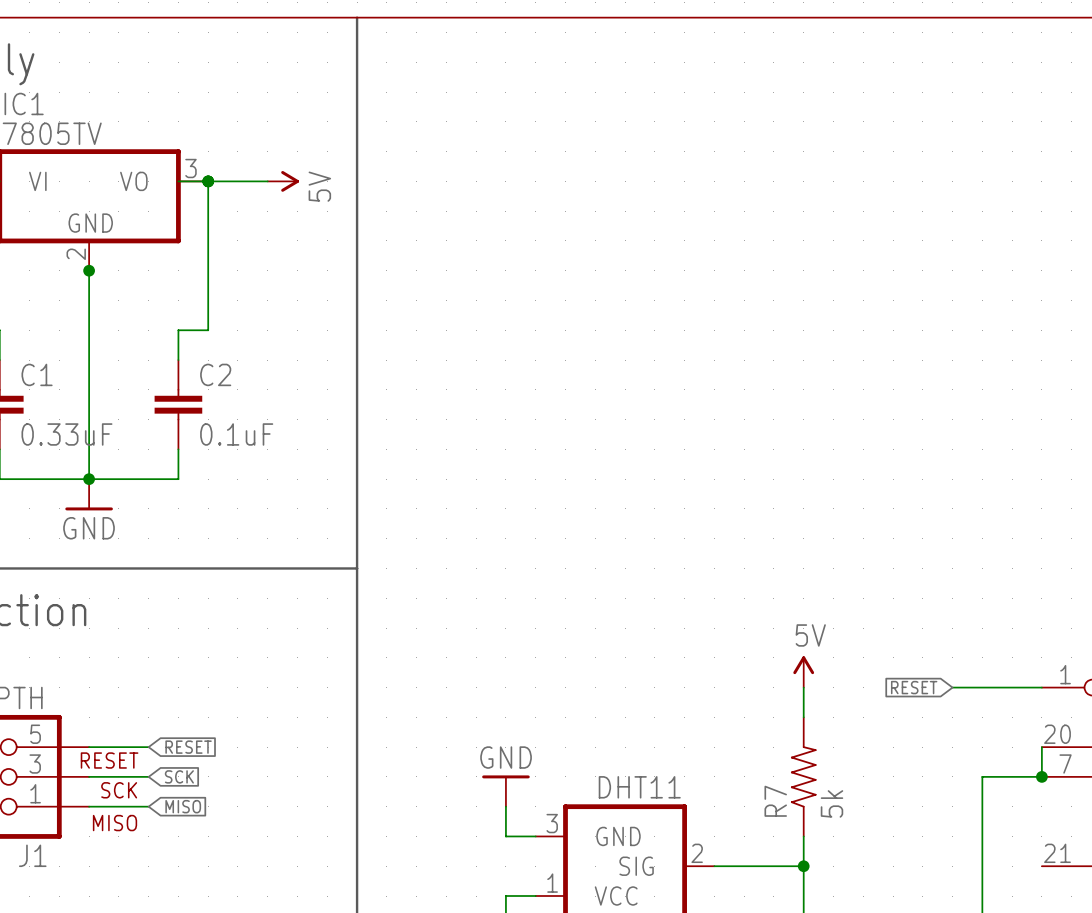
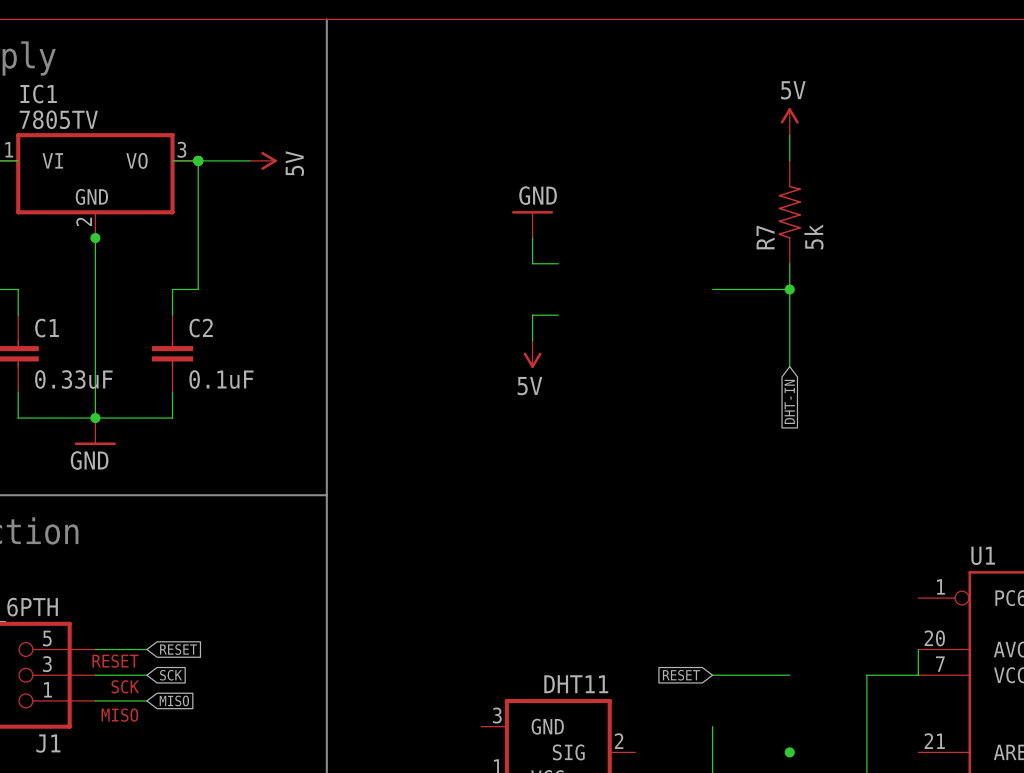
power symbol: none -> 5V (789, 121)
wire: none -> (789, 135) (789, 160)
power symbol: none -> GND (532, 224)
wire: none -> (532, 238) (532, 263) (558, 263)
wire: none -> (789, 263) (789, 366)
wire: none -> (712, 289) (789, 289)
junction: none -> (789, 289)
wire: none -> (558, 315) (532, 315) (532, 340)
power symbol: none -> 5V (532, 354)
global label: none -> DHT-IN (789, 401)
power symbol: 5V (803, 671) -> none
wire: (803, 687) (803, 717) -> none
global label position: RESET (914, 687) -> RESET (681, 675)
wire: (952, 687) (1041, 687) -> (712, 675) (789, 675)
R7 position: (803, 776) -> (789, 212)
junction: (1041, 776) -> none
power symbol: GND (505, 791) -> none
wire: (505, 806) (505, 836) (535, 836) -> none
wire: (714, 866) (803, 866) -> none
junction: (803, 866) -> none
junction: none -> (789, 752)

